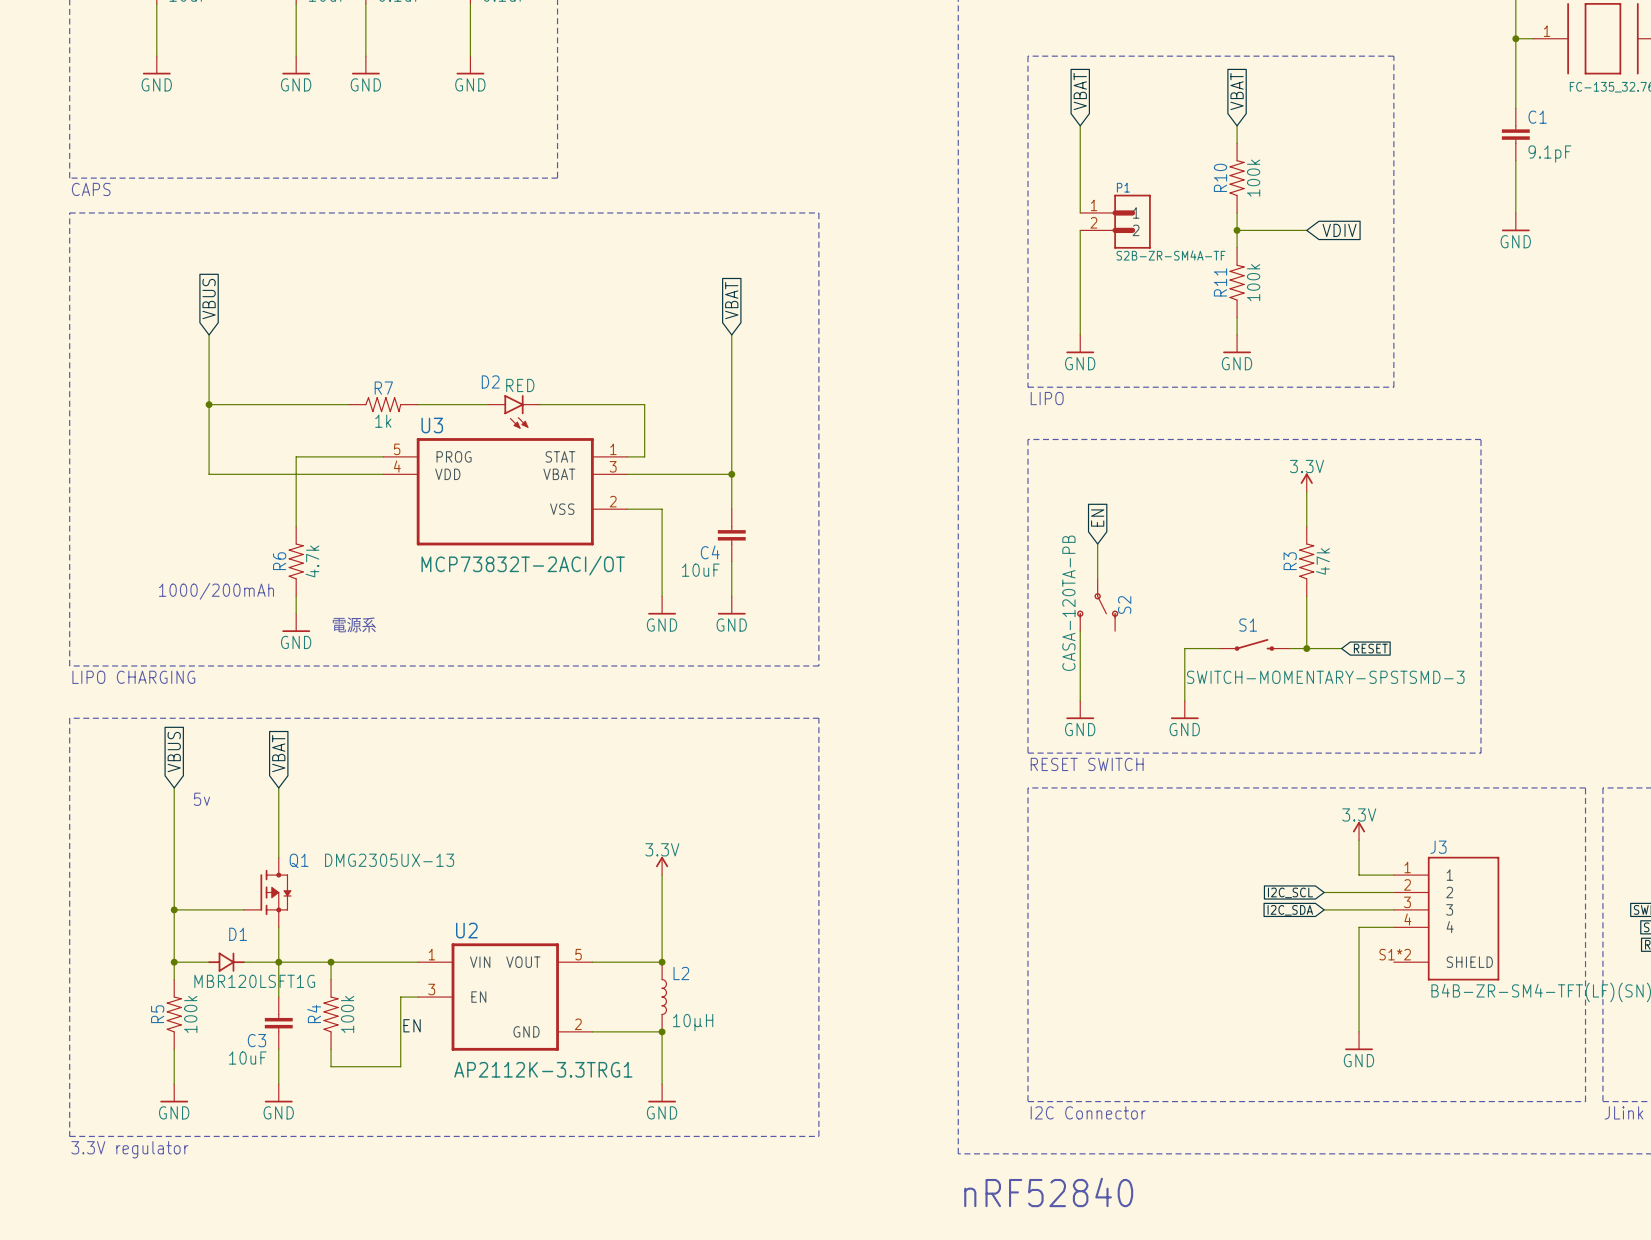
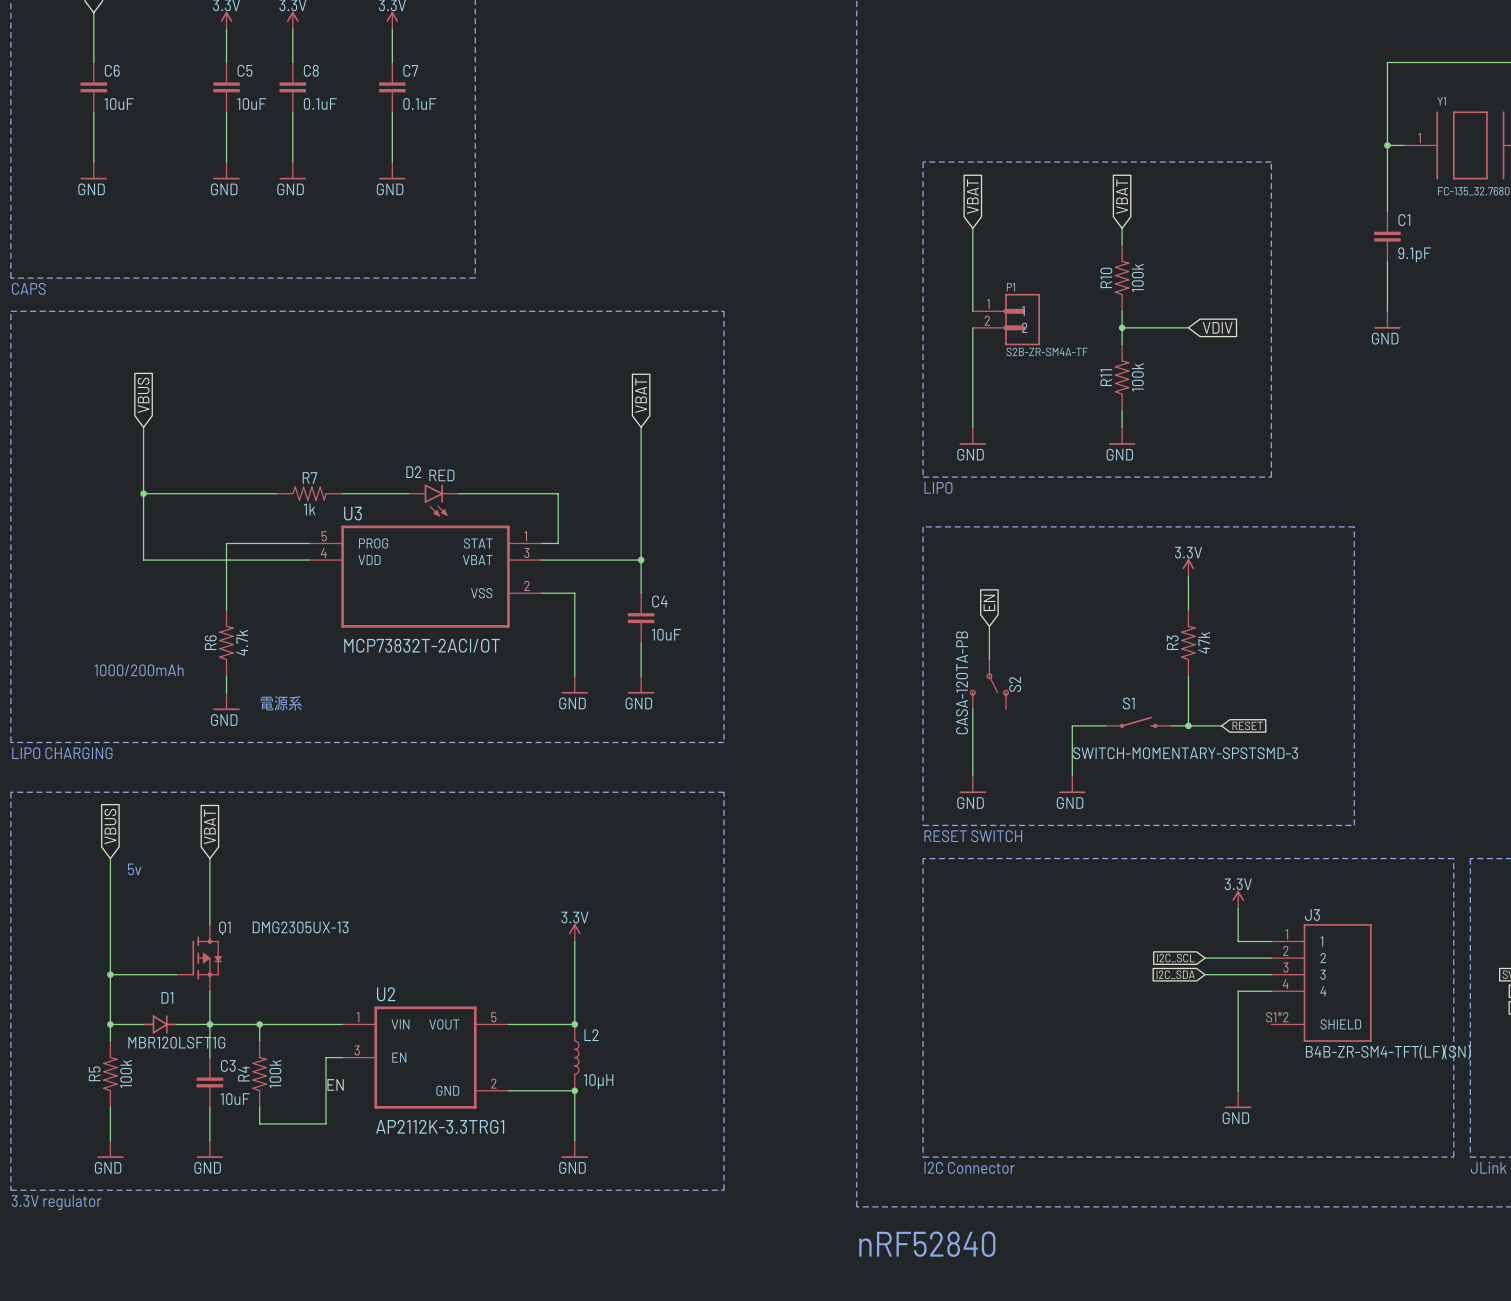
C4 name position: C4 (710, 552) -> C4 (659, 601)
C4 value position: 10uF (700, 570) -> 10uF (666, 634)
C3 name position: C3 (256, 1040) -> C3 (228, 1065)
C3 value position: 10uF (247, 1058) -> 10uF (235, 1099)

